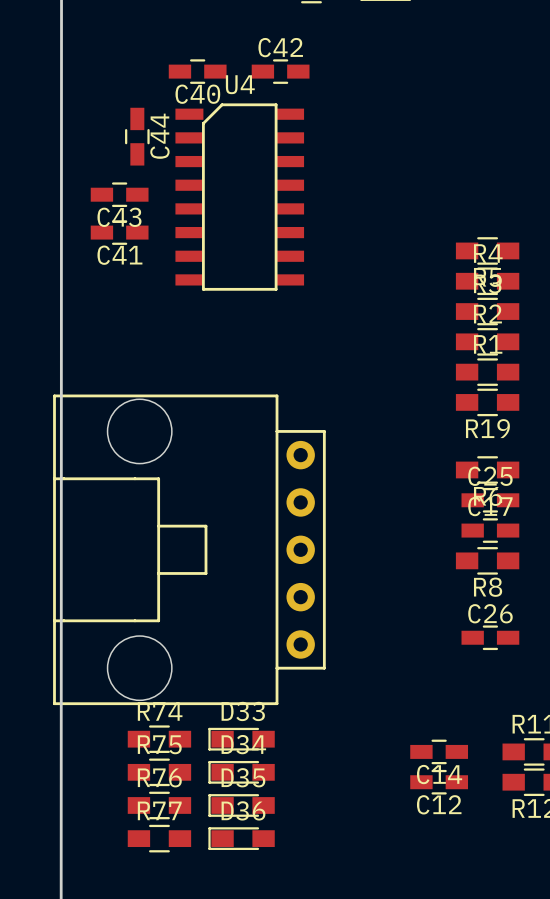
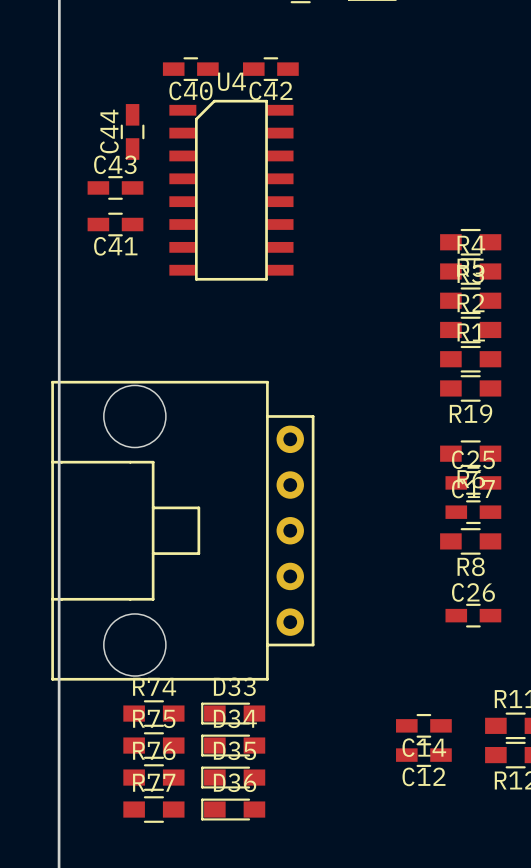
C42 name position: C42 (280, 47) -> C42 (270, 90)
C44 name position: C44 (159, 136) -> C44 (109, 131)
C43 name position: C43 (119, 217) -> C43 (115, 164)

